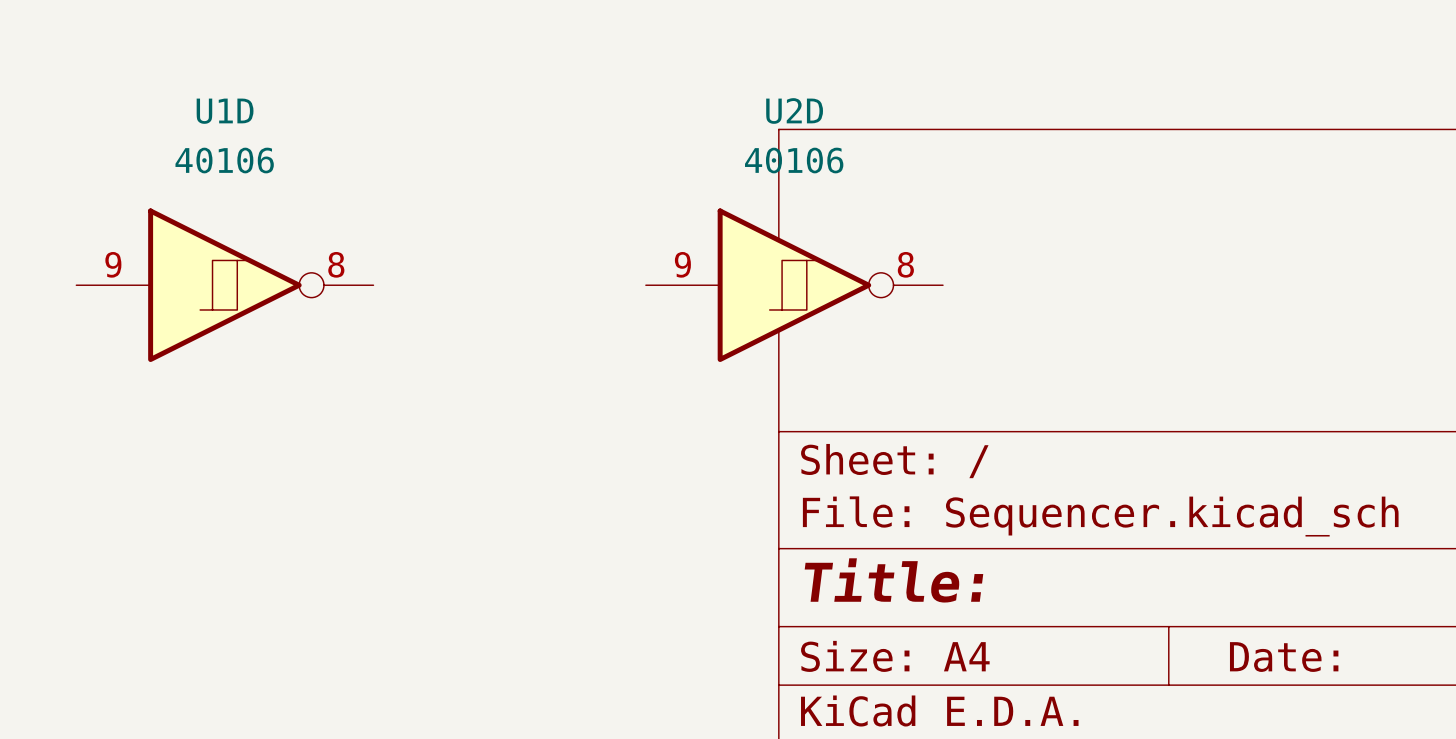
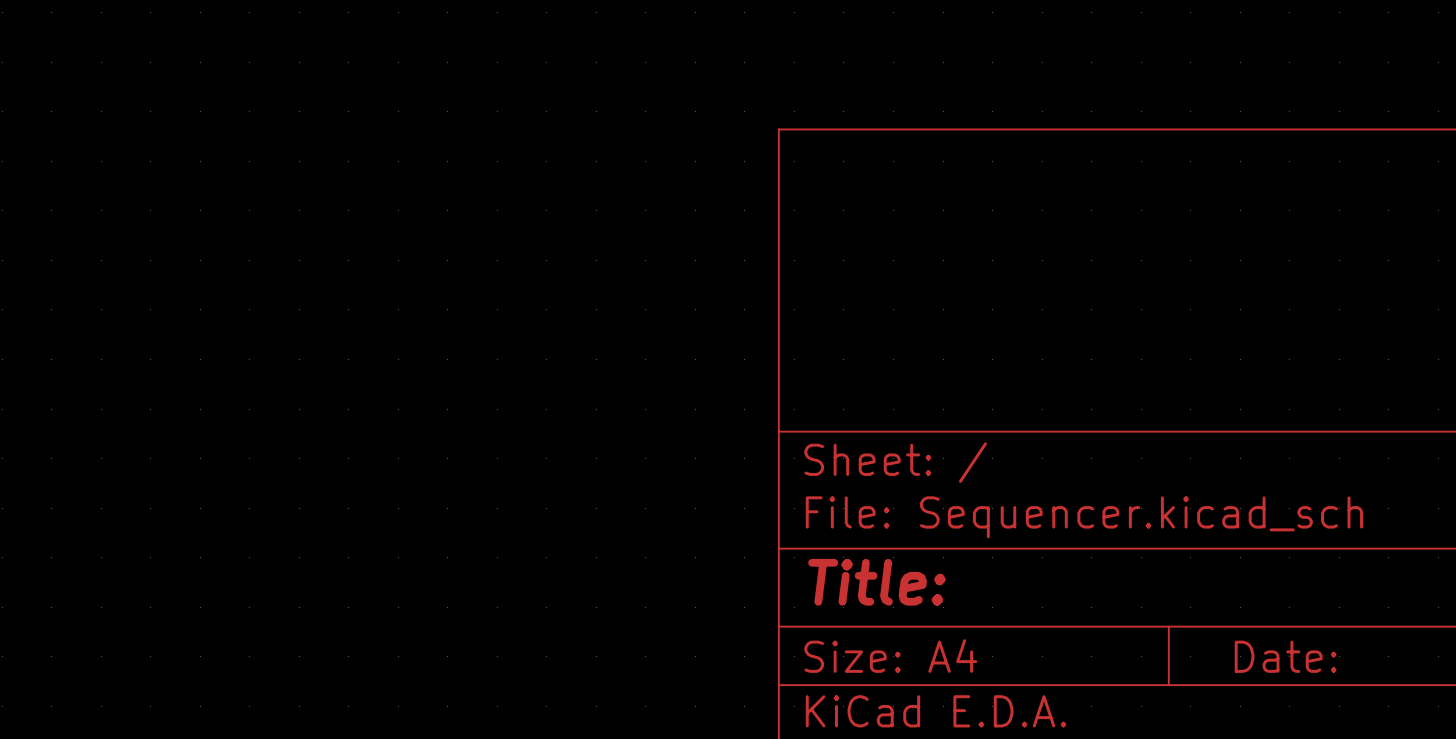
U1D: 40106 (224, 285) -> none
U2D: 40106 (794, 285) -> none

